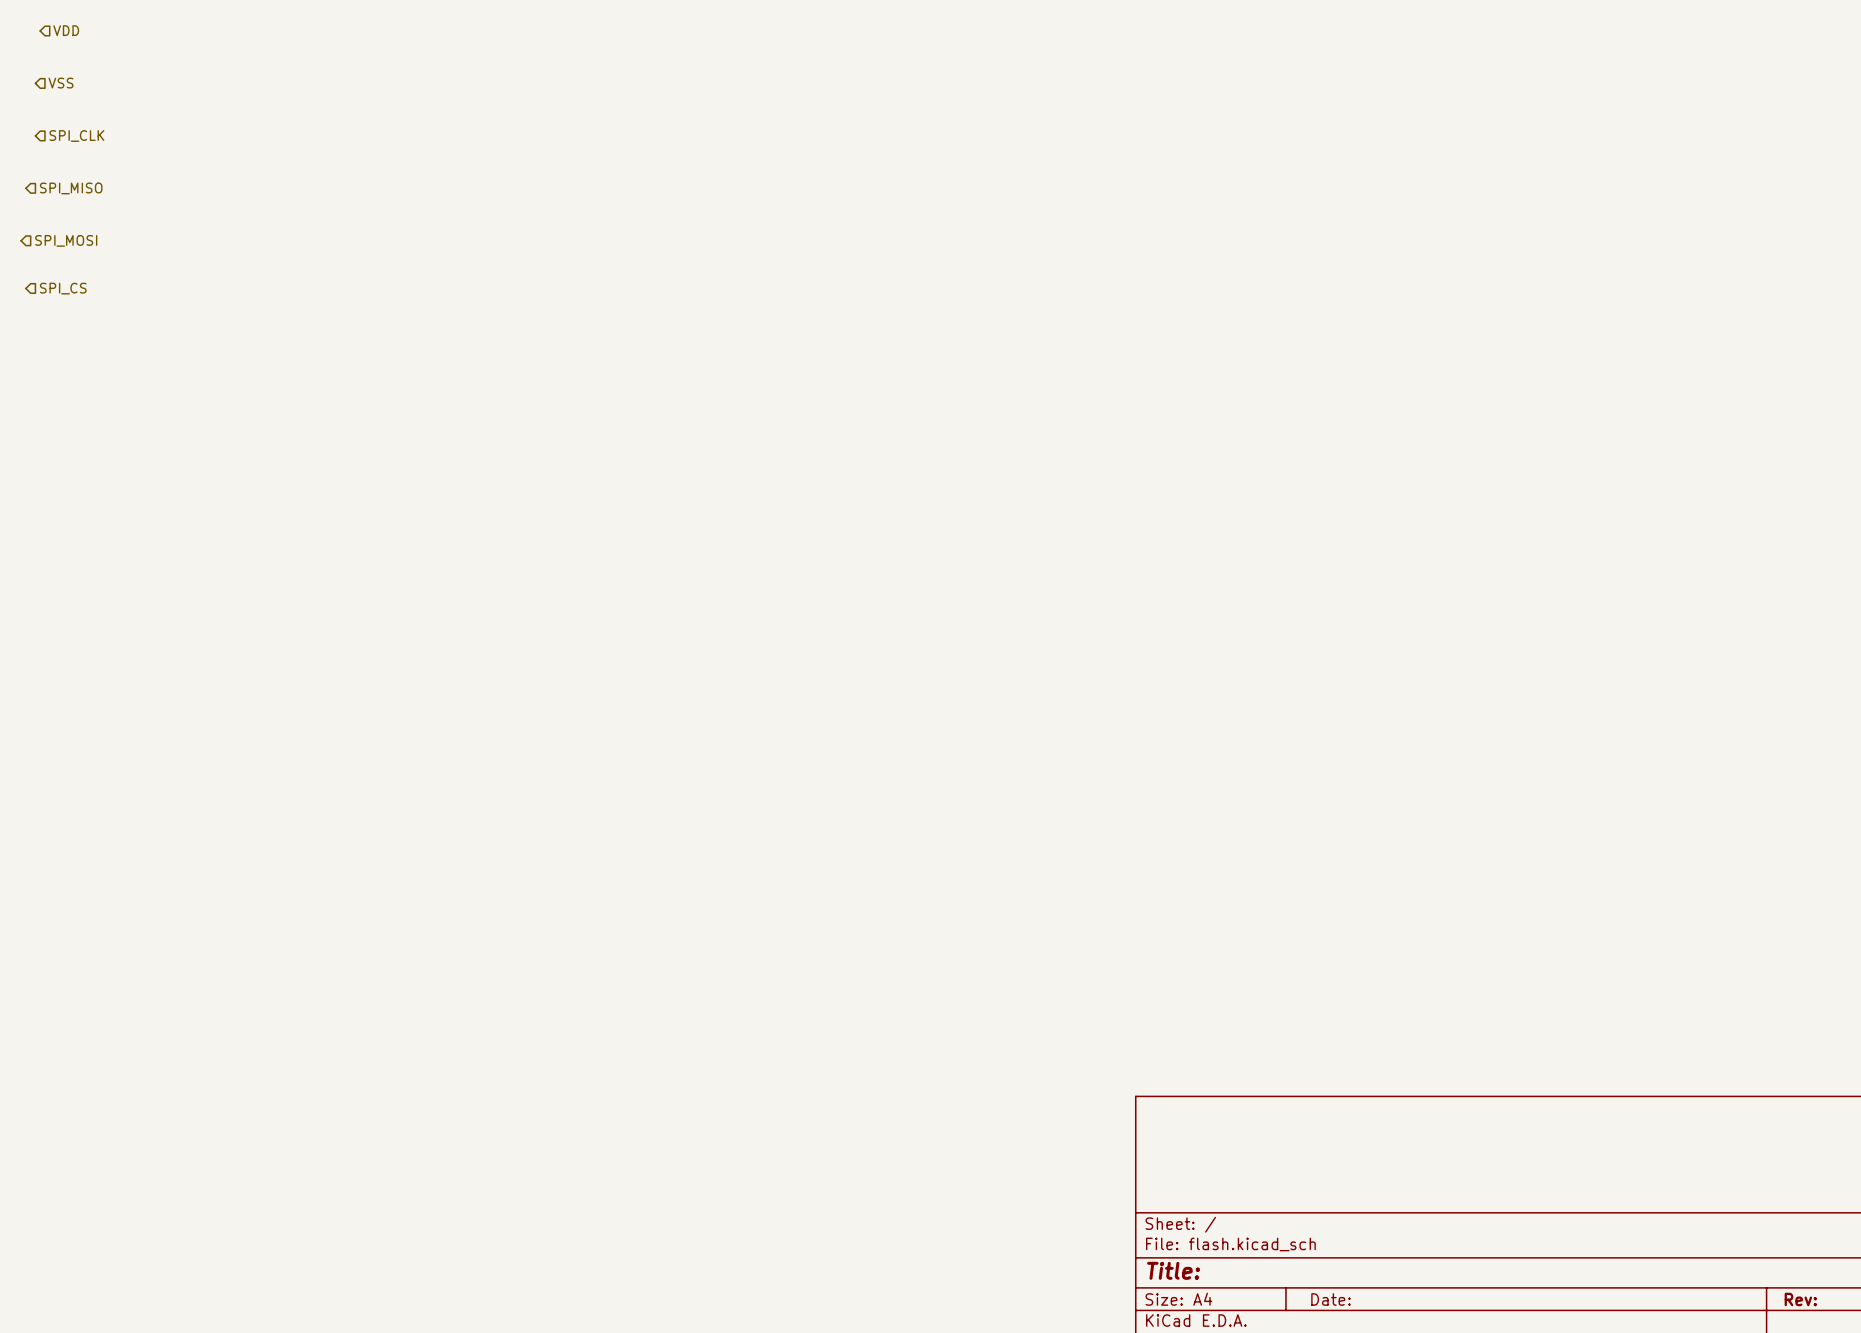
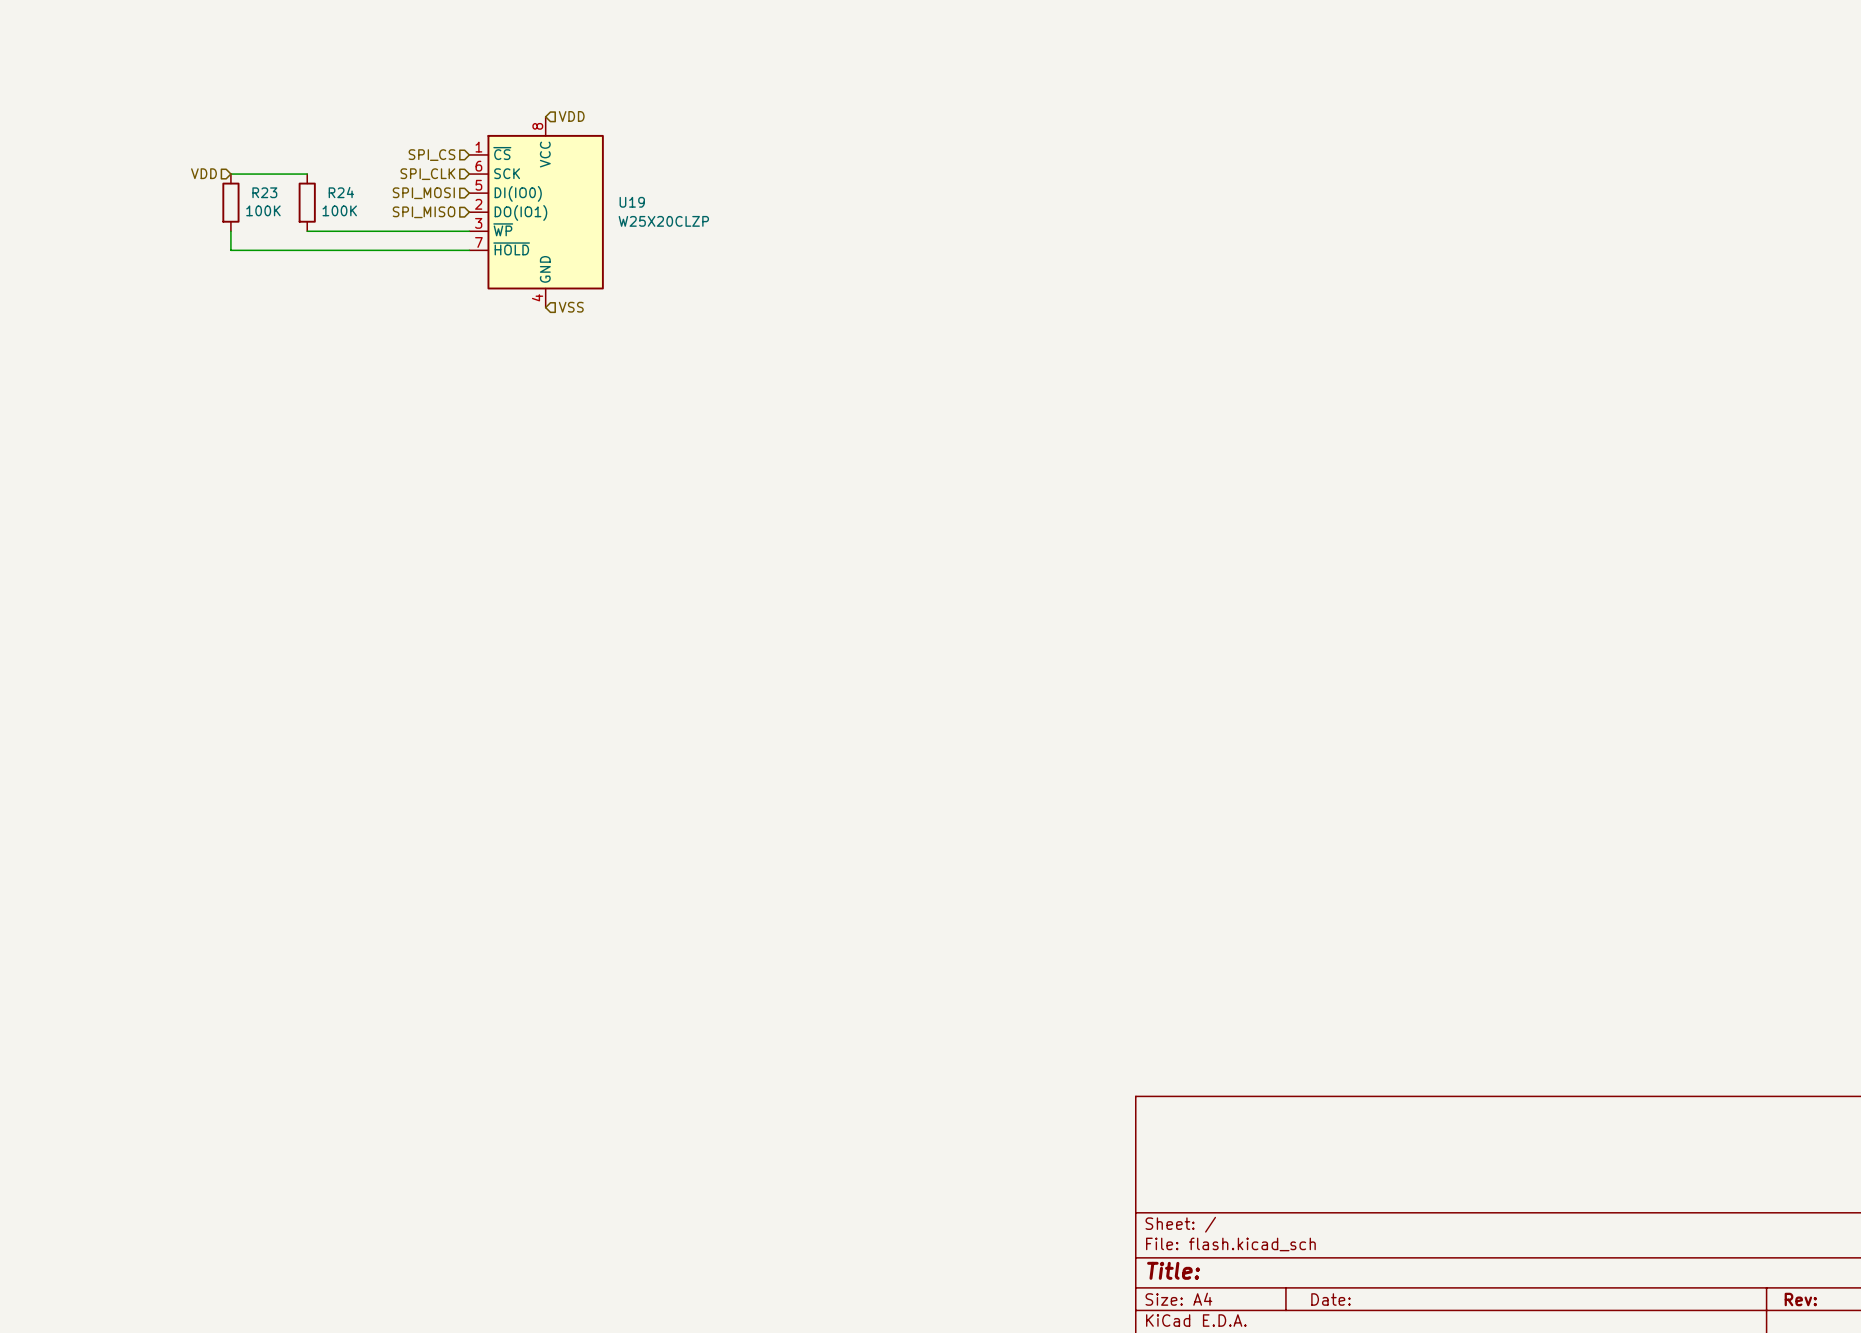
hierarchical label: VDD (66, 30) -> none
hierarchical label: VSS (61, 83) -> none
hierarchical label: none -> VDD (571, 116)
hierarchical label: SPI_CLK (76, 135) -> none
hierarchical label: none -> SPI_CS (431, 155)
hierarchical label: none -> VDD (203, 173)
wire: none -> (230, 174) (307, 174)
hierarchical label: none -> SPI_CLK (427, 174)
hierarchical label: SPI_MISO (71, 188) -> none
hierarchical label: none -> SPI_MOSI (423, 193)
R23: none -> 100K (230, 202)
R24: none -> 100K (307, 202)
hierarchical label: none -> SPI_MISO (424, 212)
U19: none -> W25X20CLZP (536, 212)
wire: none -> (230, 231) (230, 250) (469, 250)
wire: none -> (307, 231) (469, 231)
hierarchical label: SPI_MOSI (66, 240) -> none
hierarchical label: SPI_CS (63, 288) -> none
hierarchical label: none -> VSS (571, 307)

